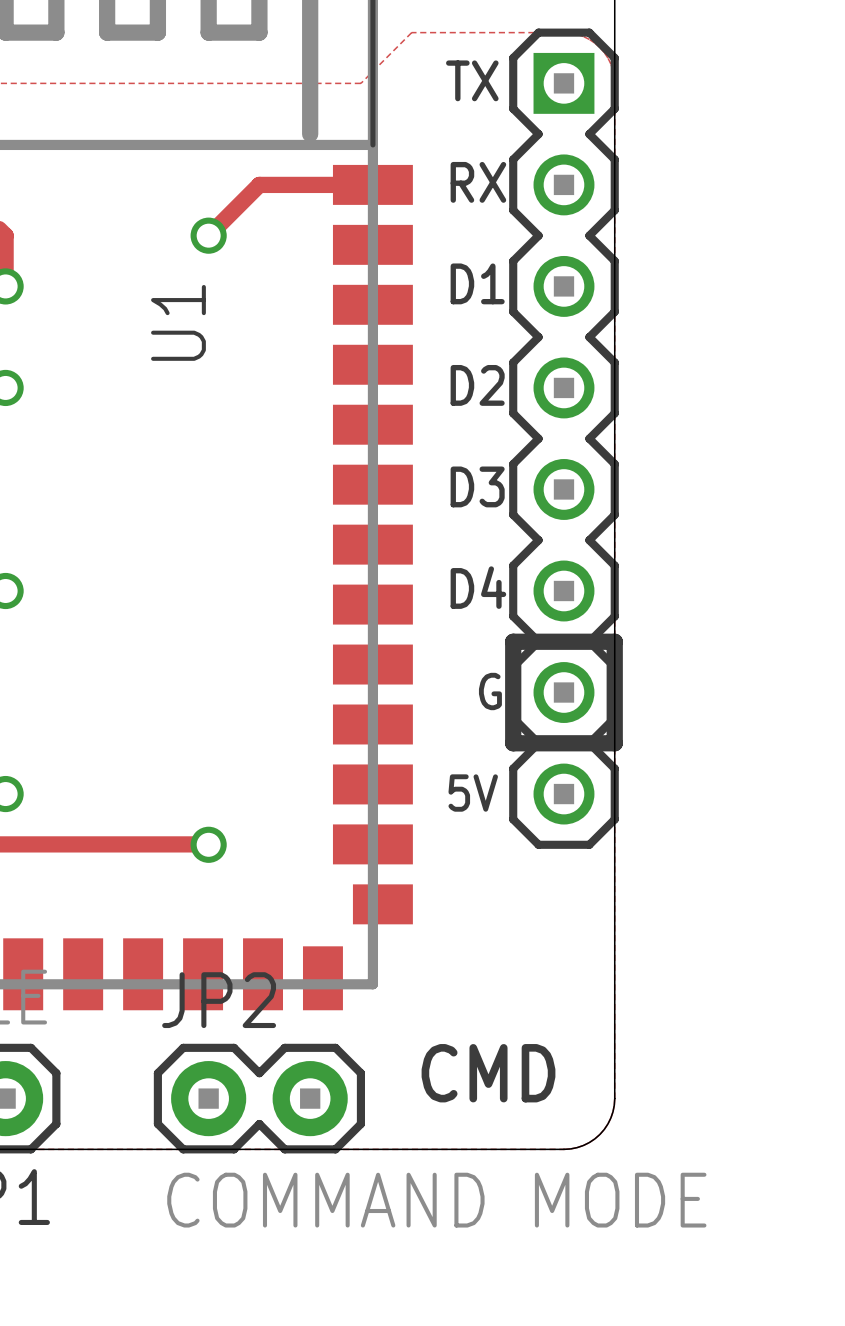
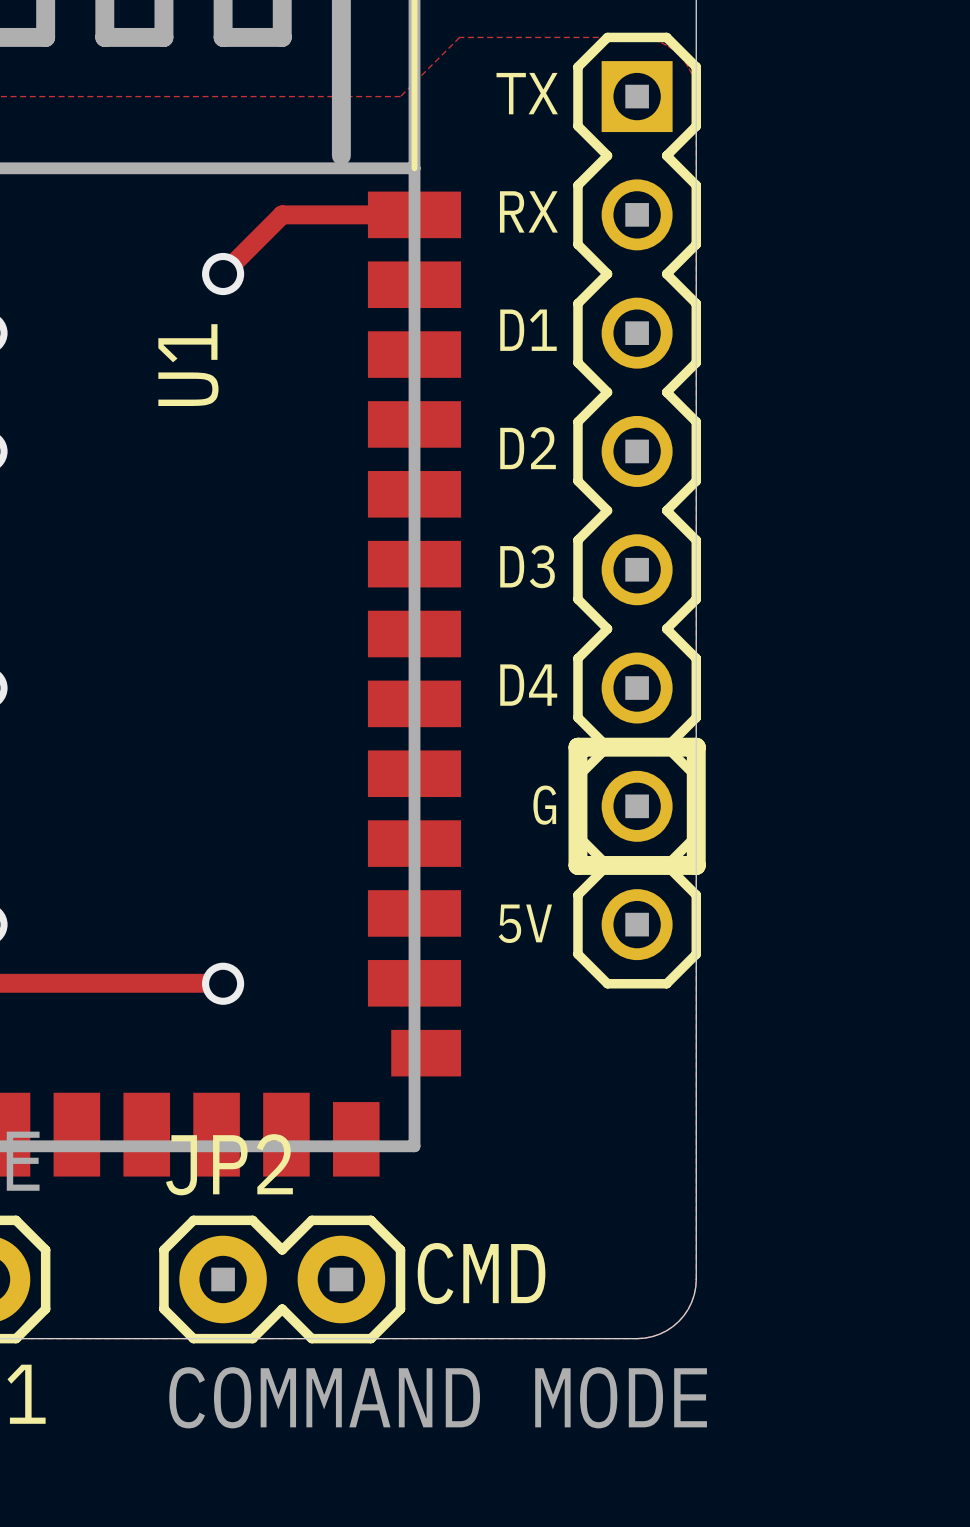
text position: CMD (488, 1073) -> CMD (481, 1273)

